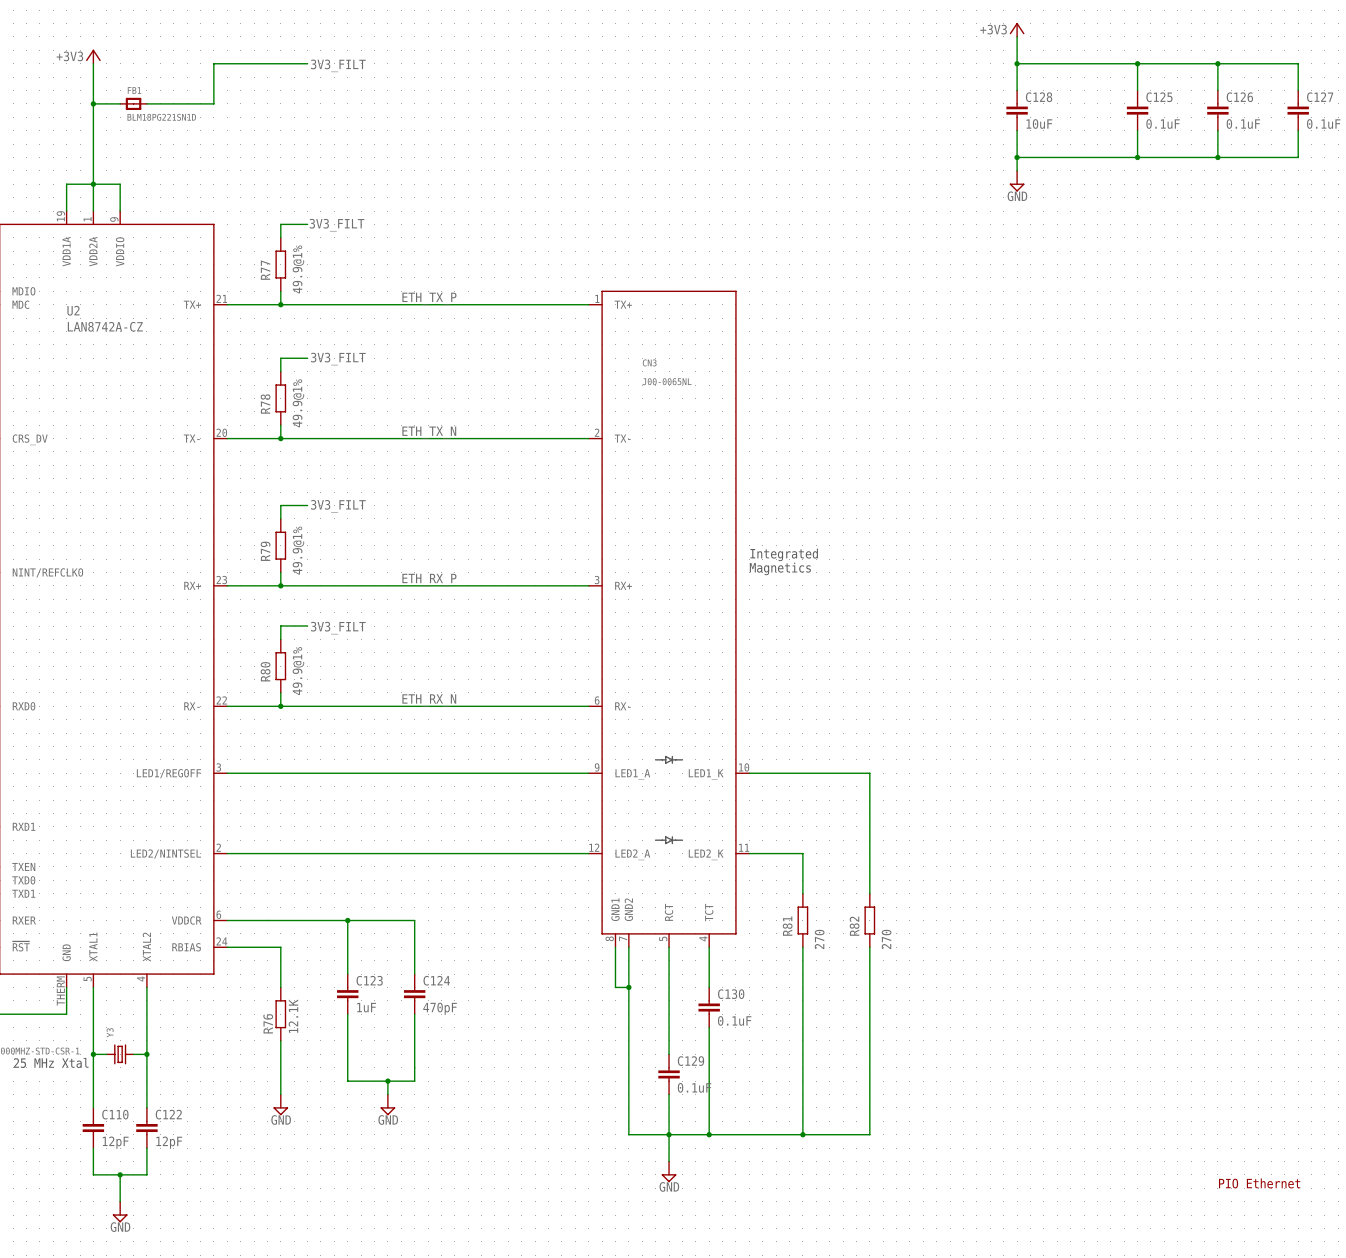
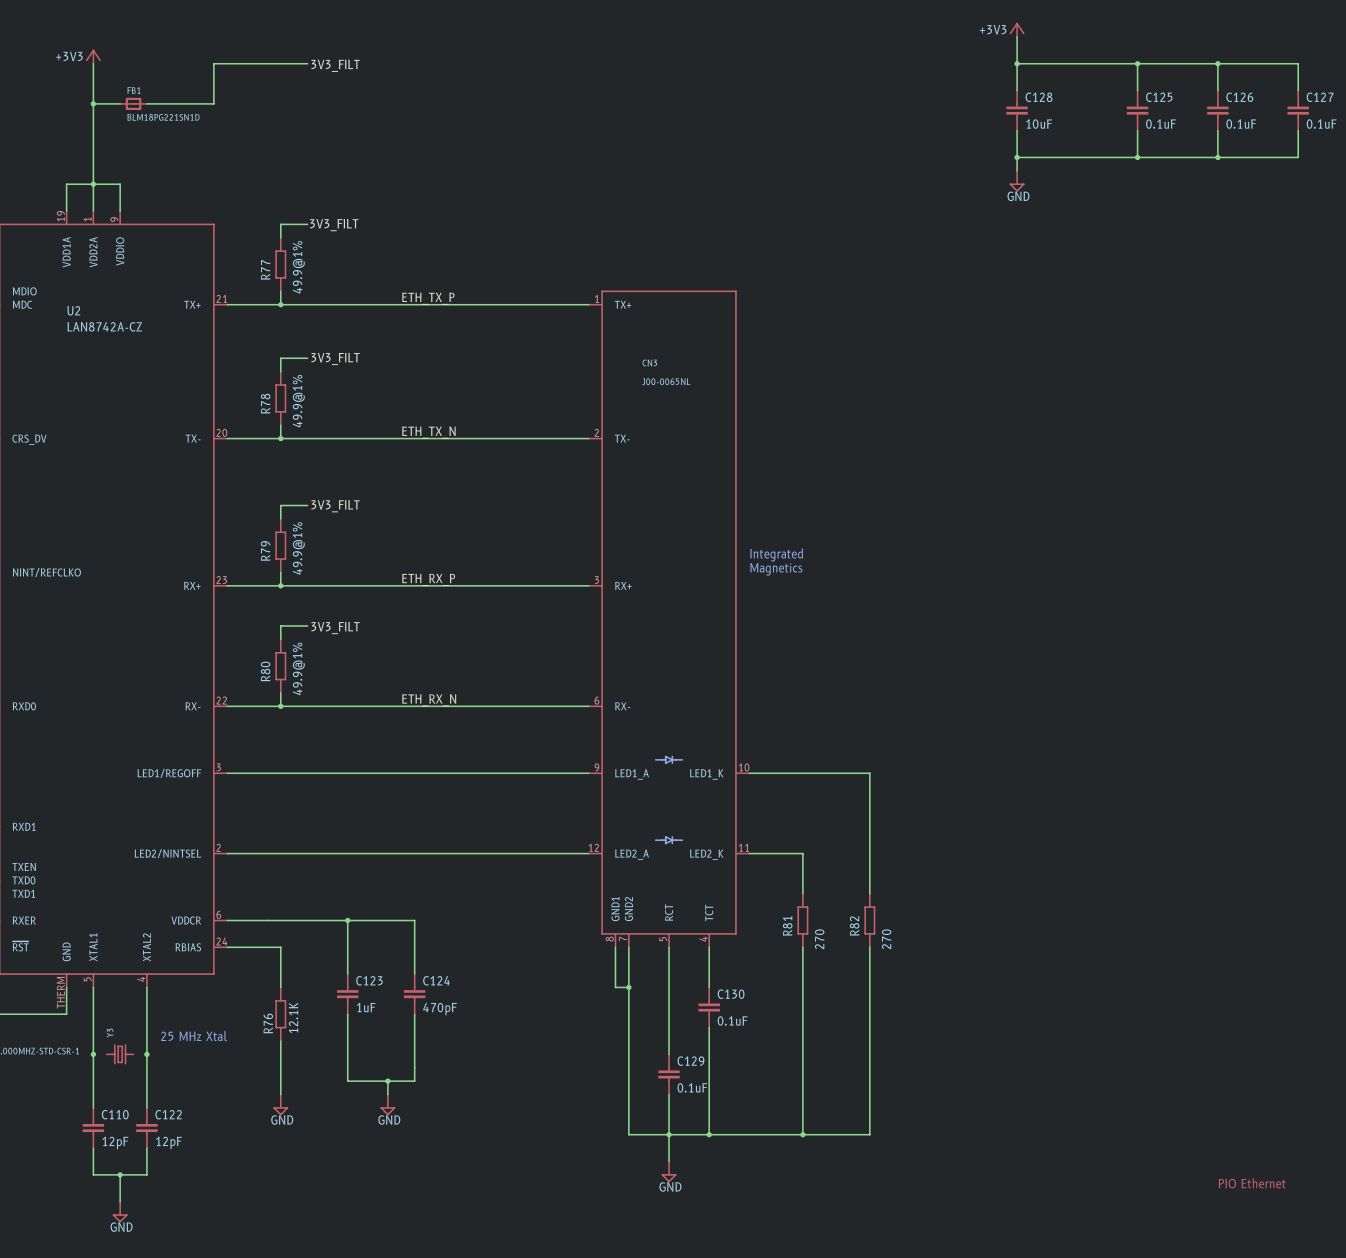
text: none -> 25 MHz Xtal (194, 1036)
wire: (93, 1054) (106, 1054) -> none
wire: (133, 1054) (146, 1054) -> none
text: 25 MHz Xtal (51, 1062) -> none

